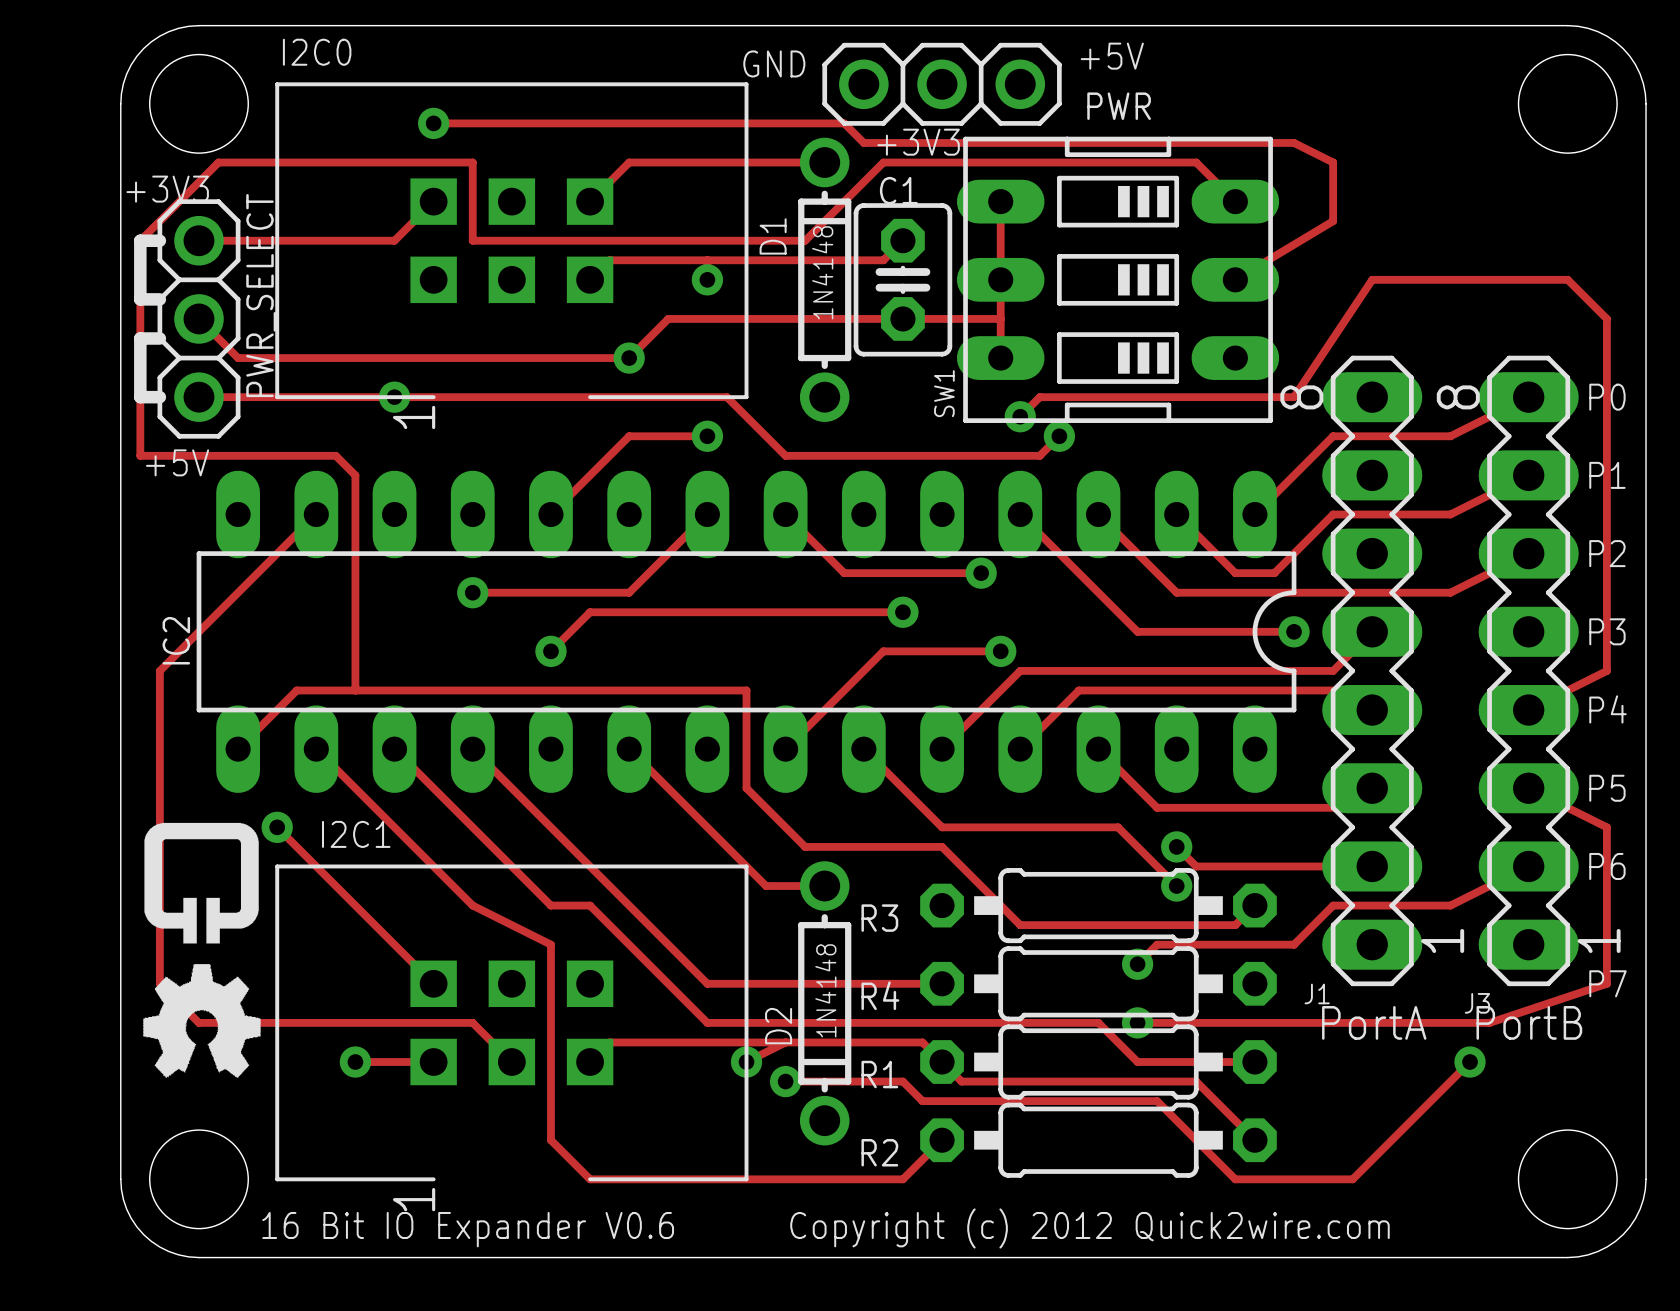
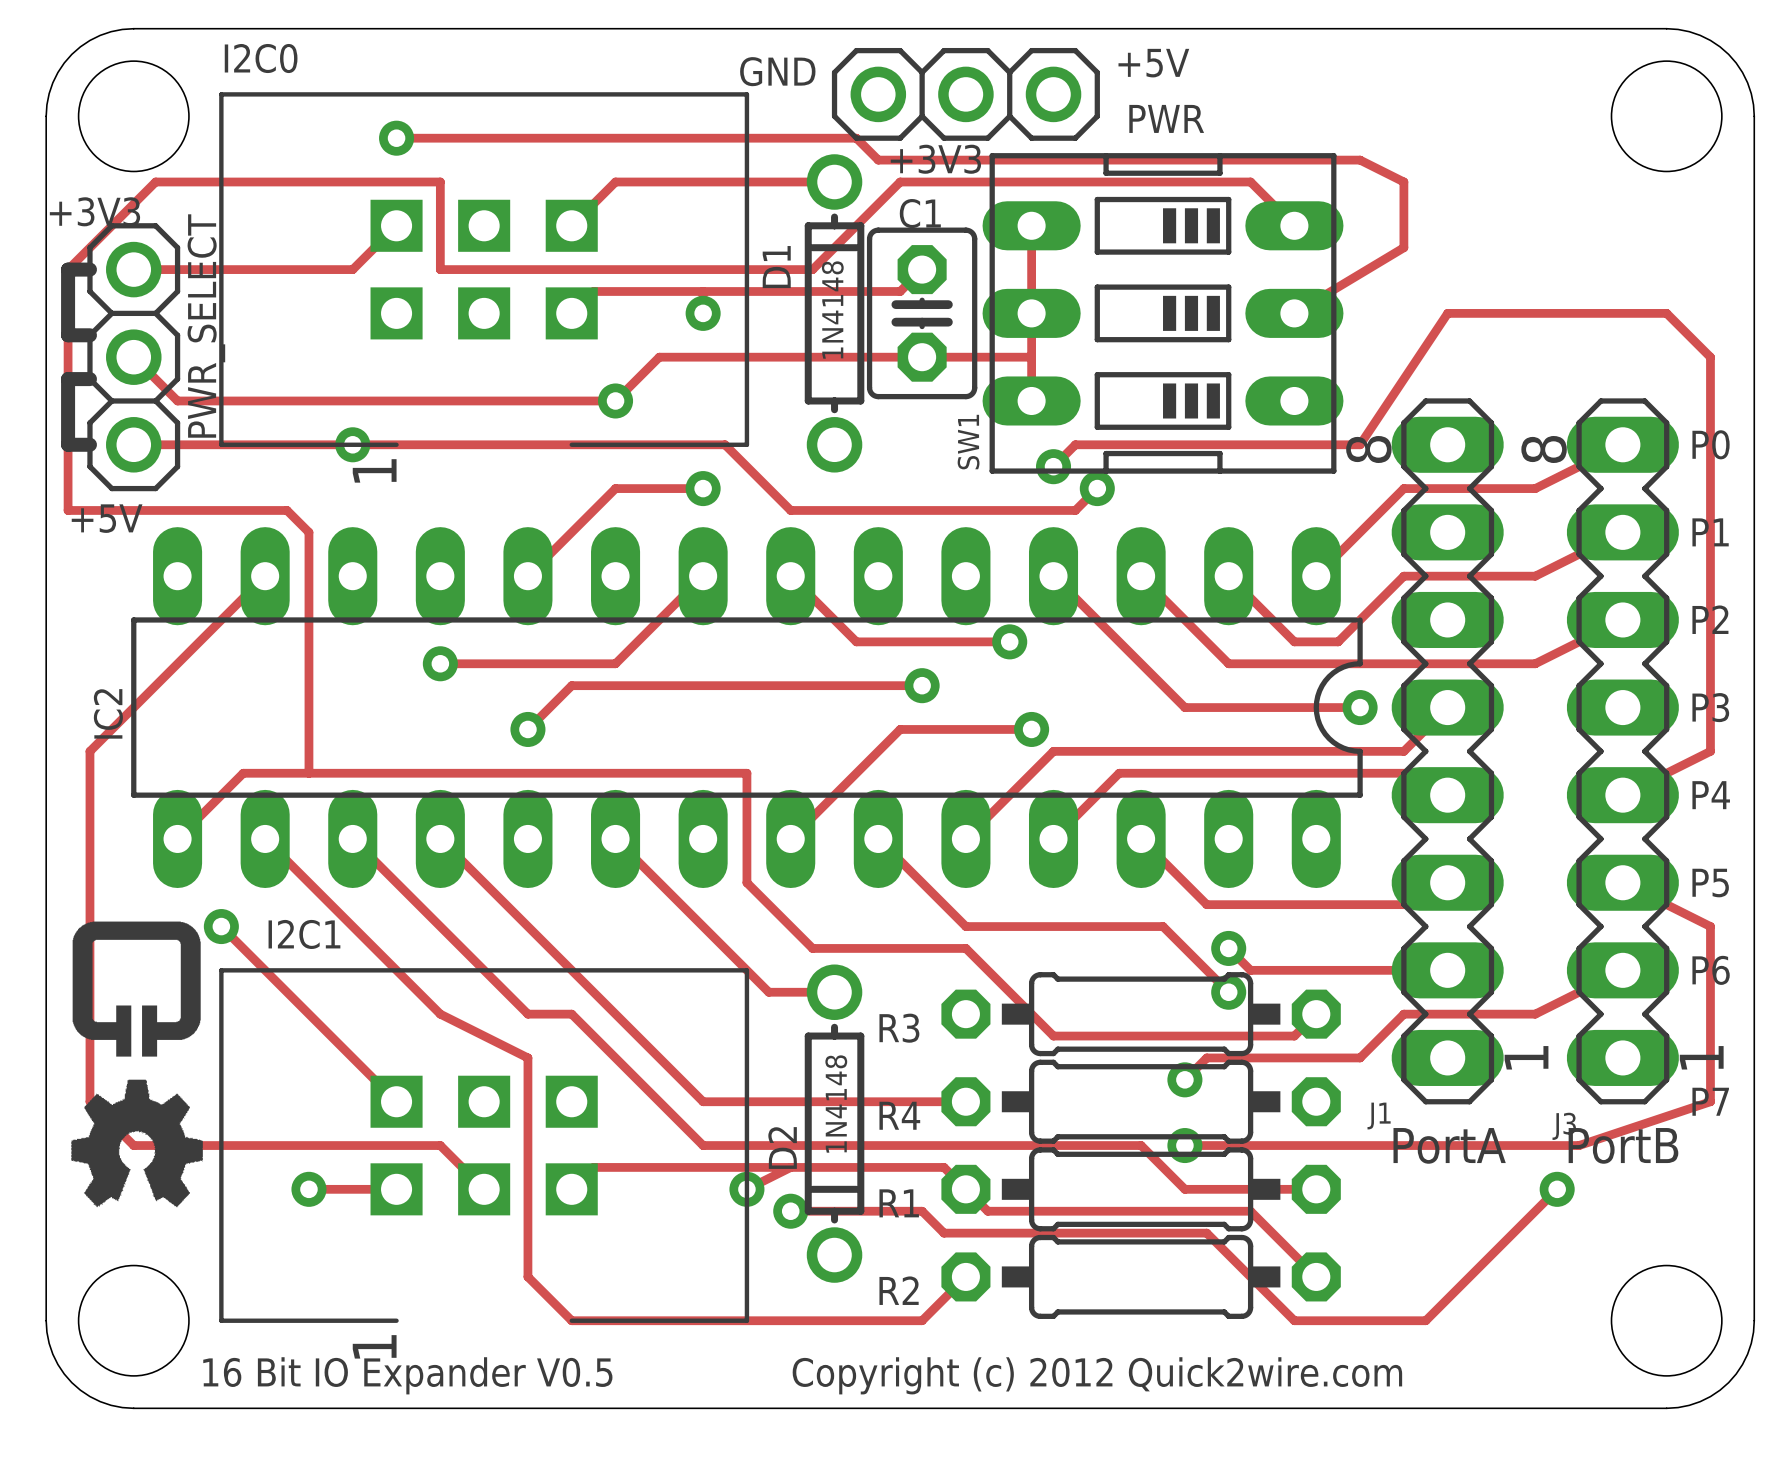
text: 16 Bit IO Expander V0.6 (468, 1229) -> 16 Bit IO Expander V0.5 (407, 1375)

